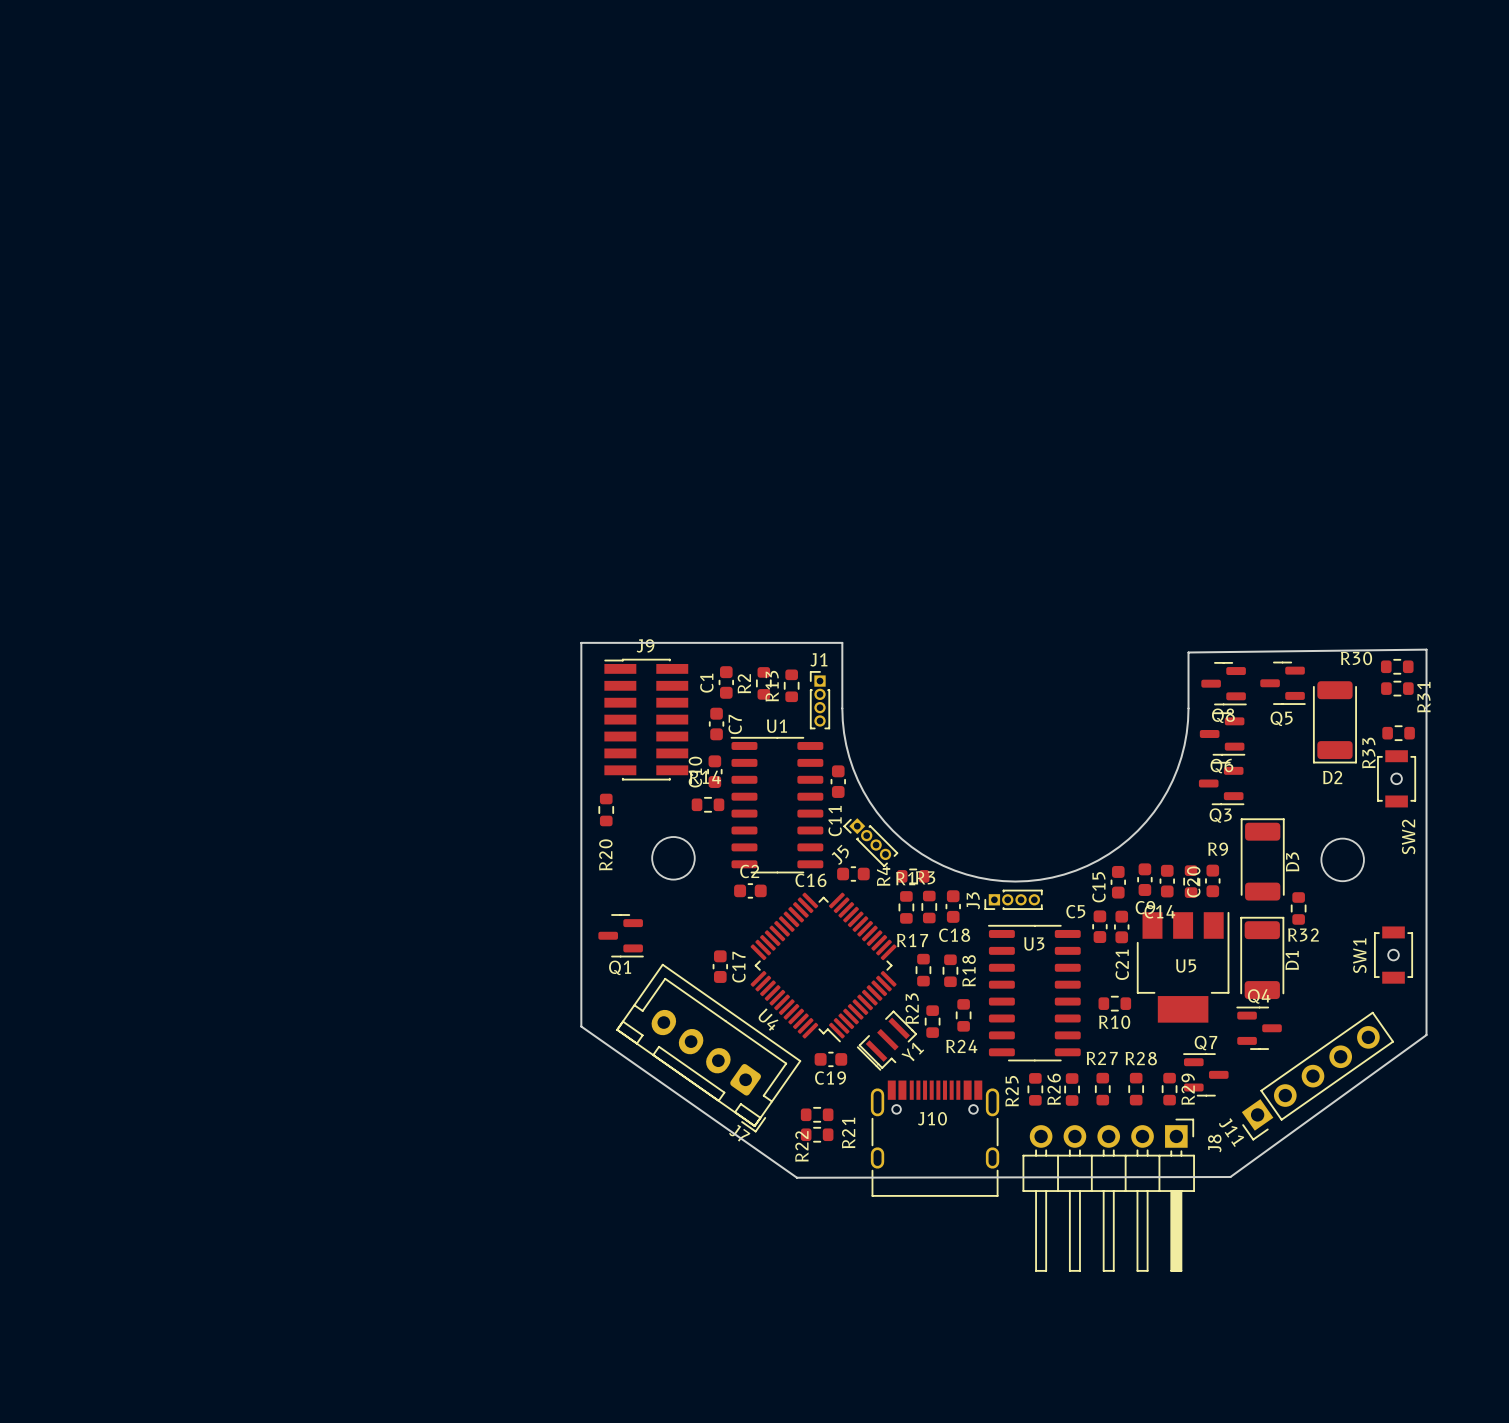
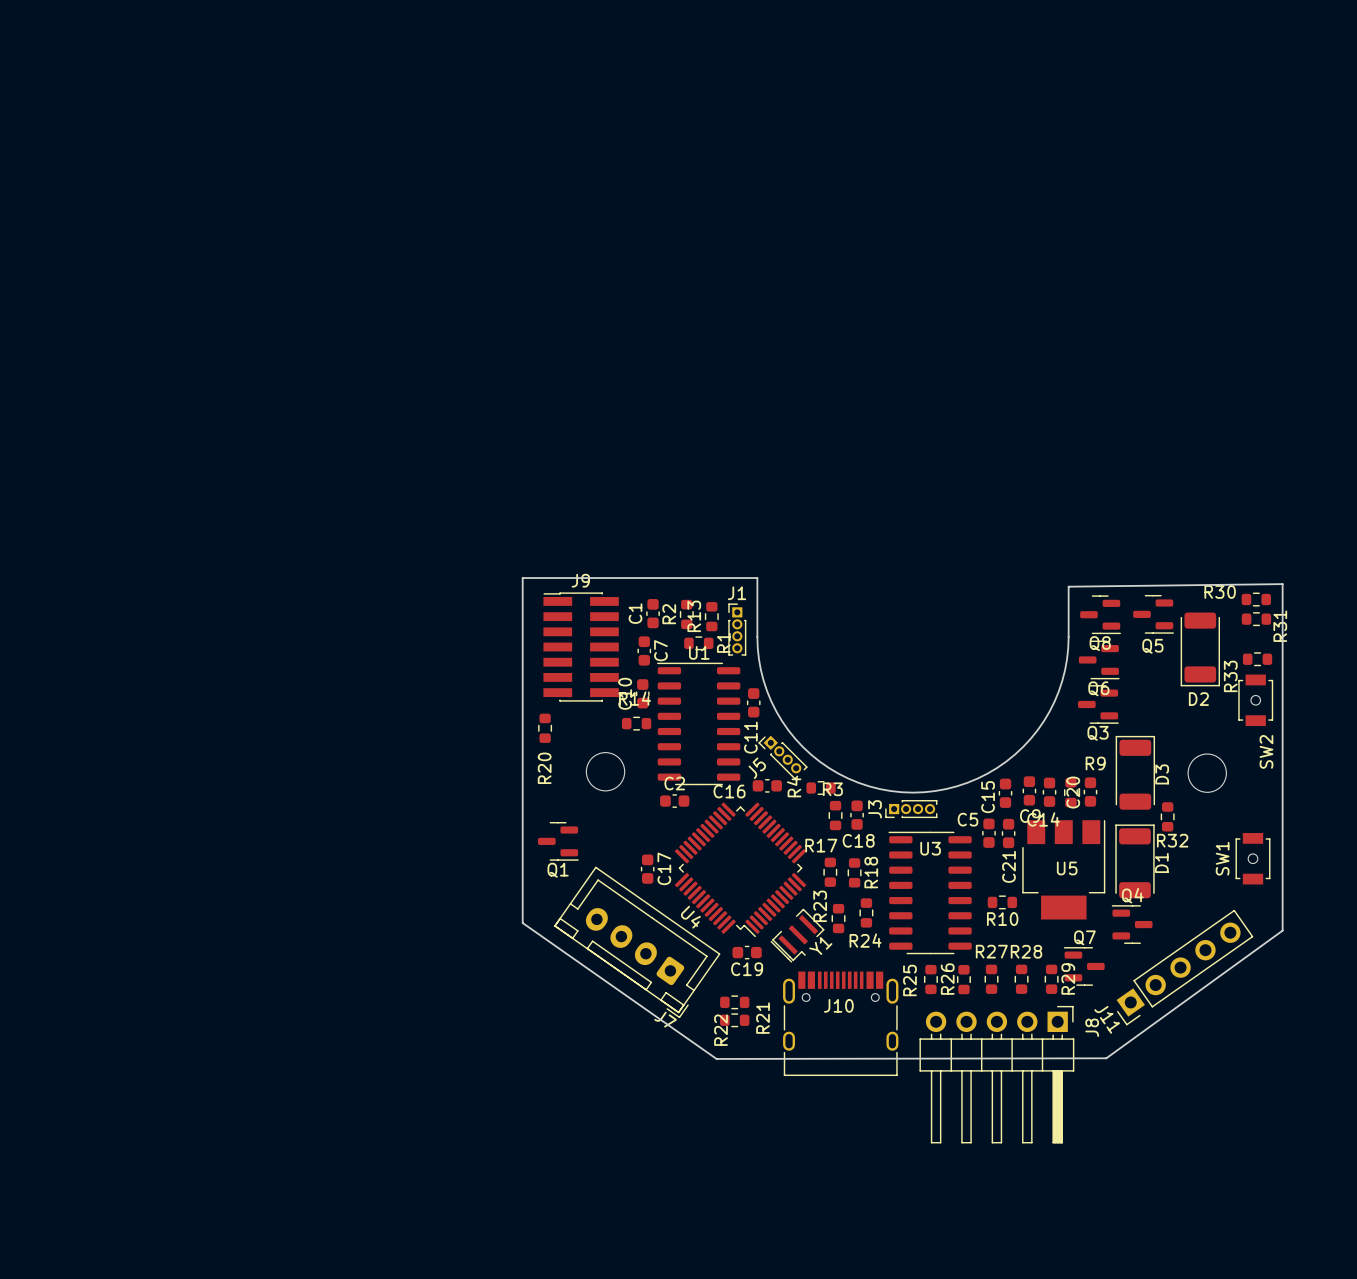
R1 rotation: 0° (906, 907) -> 90° clockwise (698, 643)
R1 position: (906, 907) -> (698, 643)

